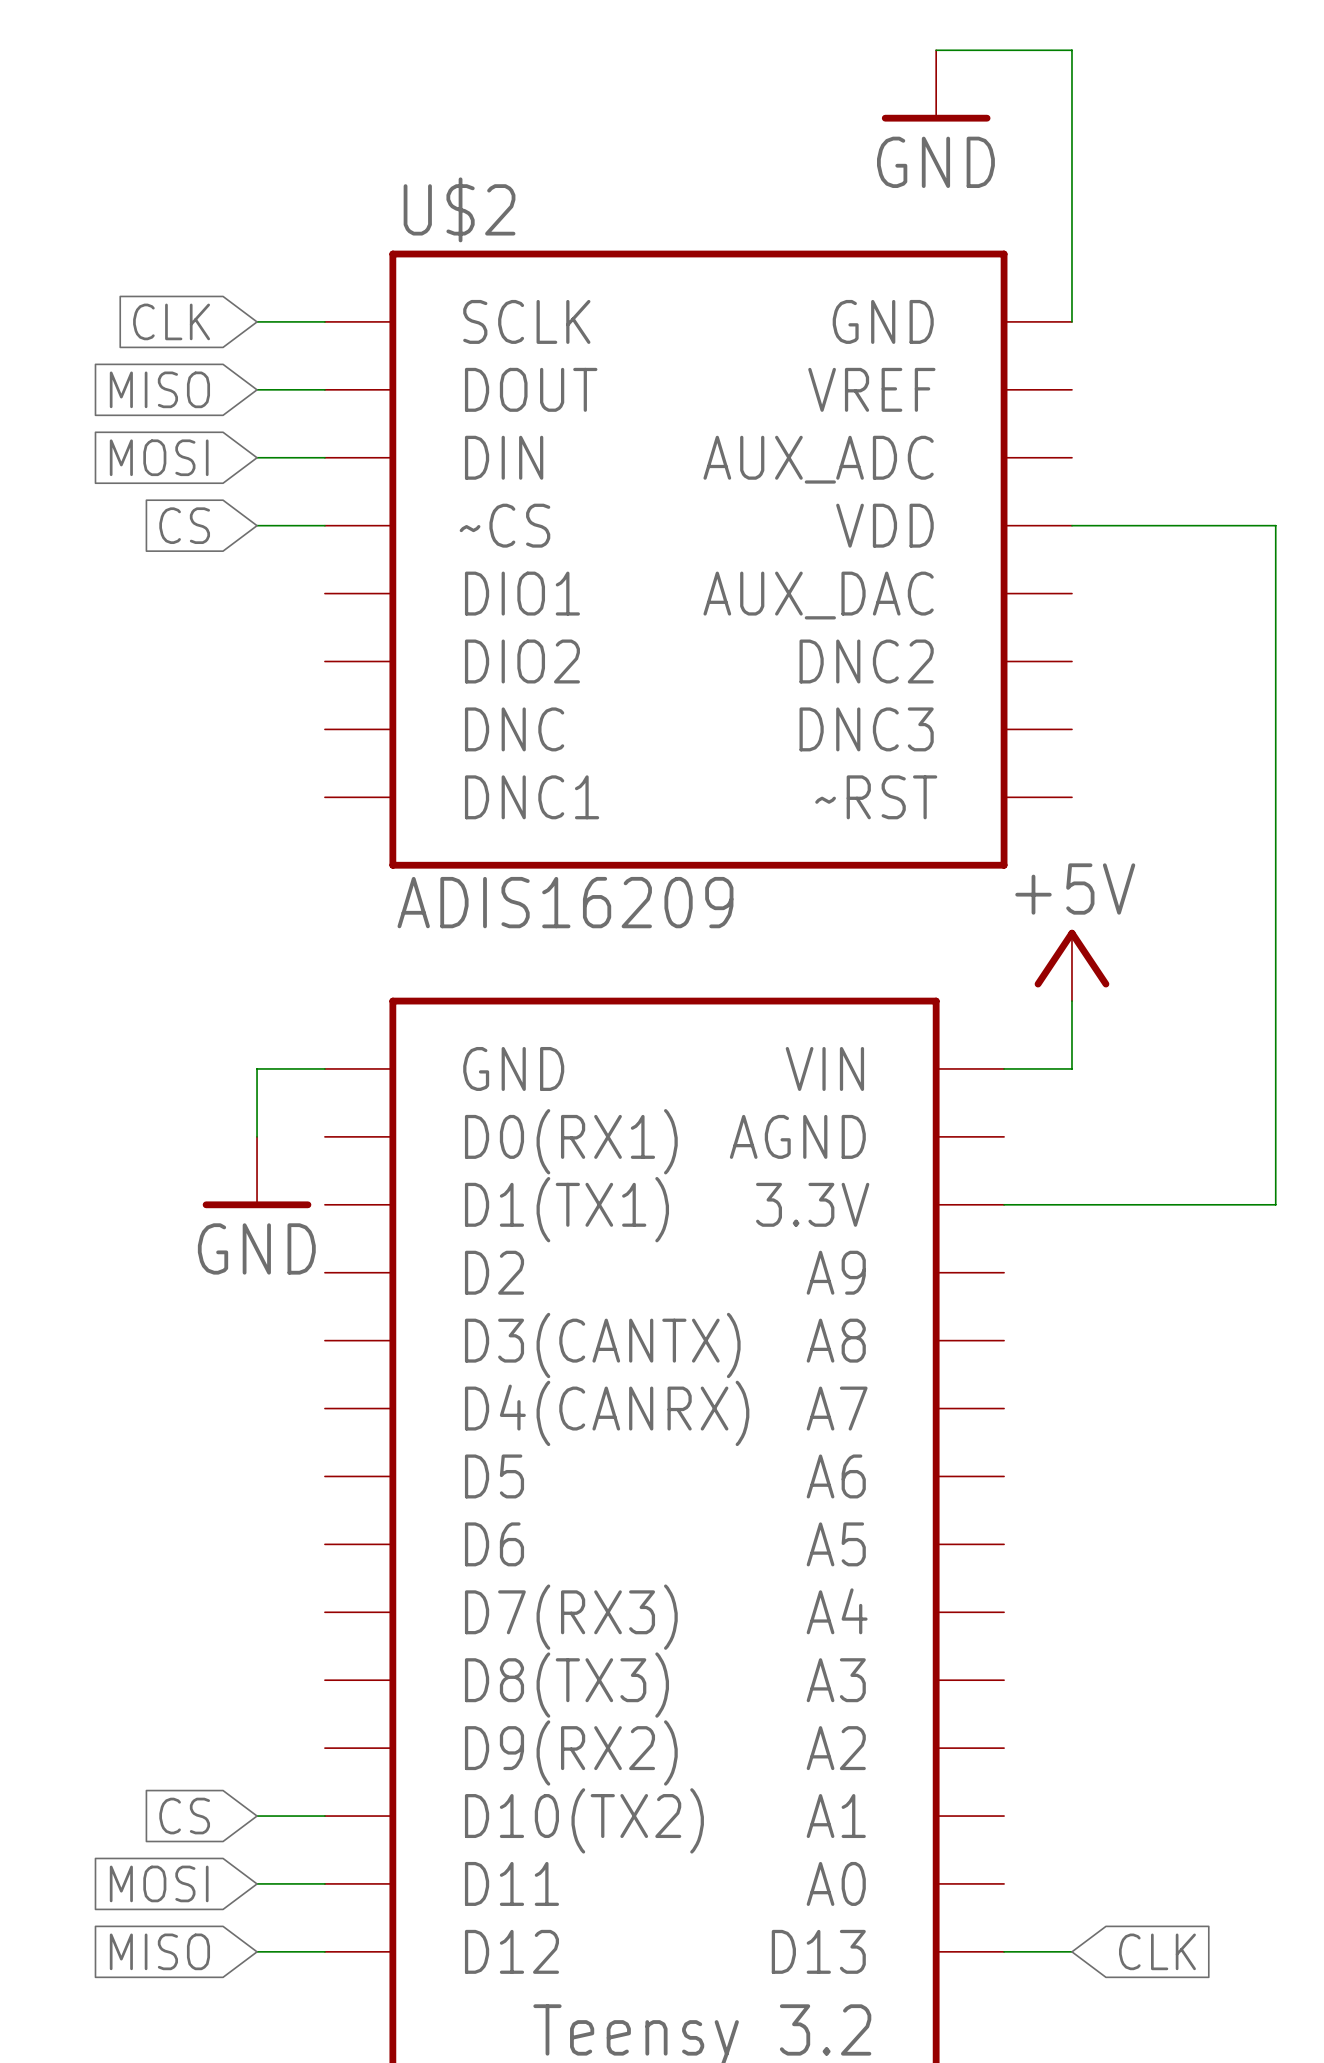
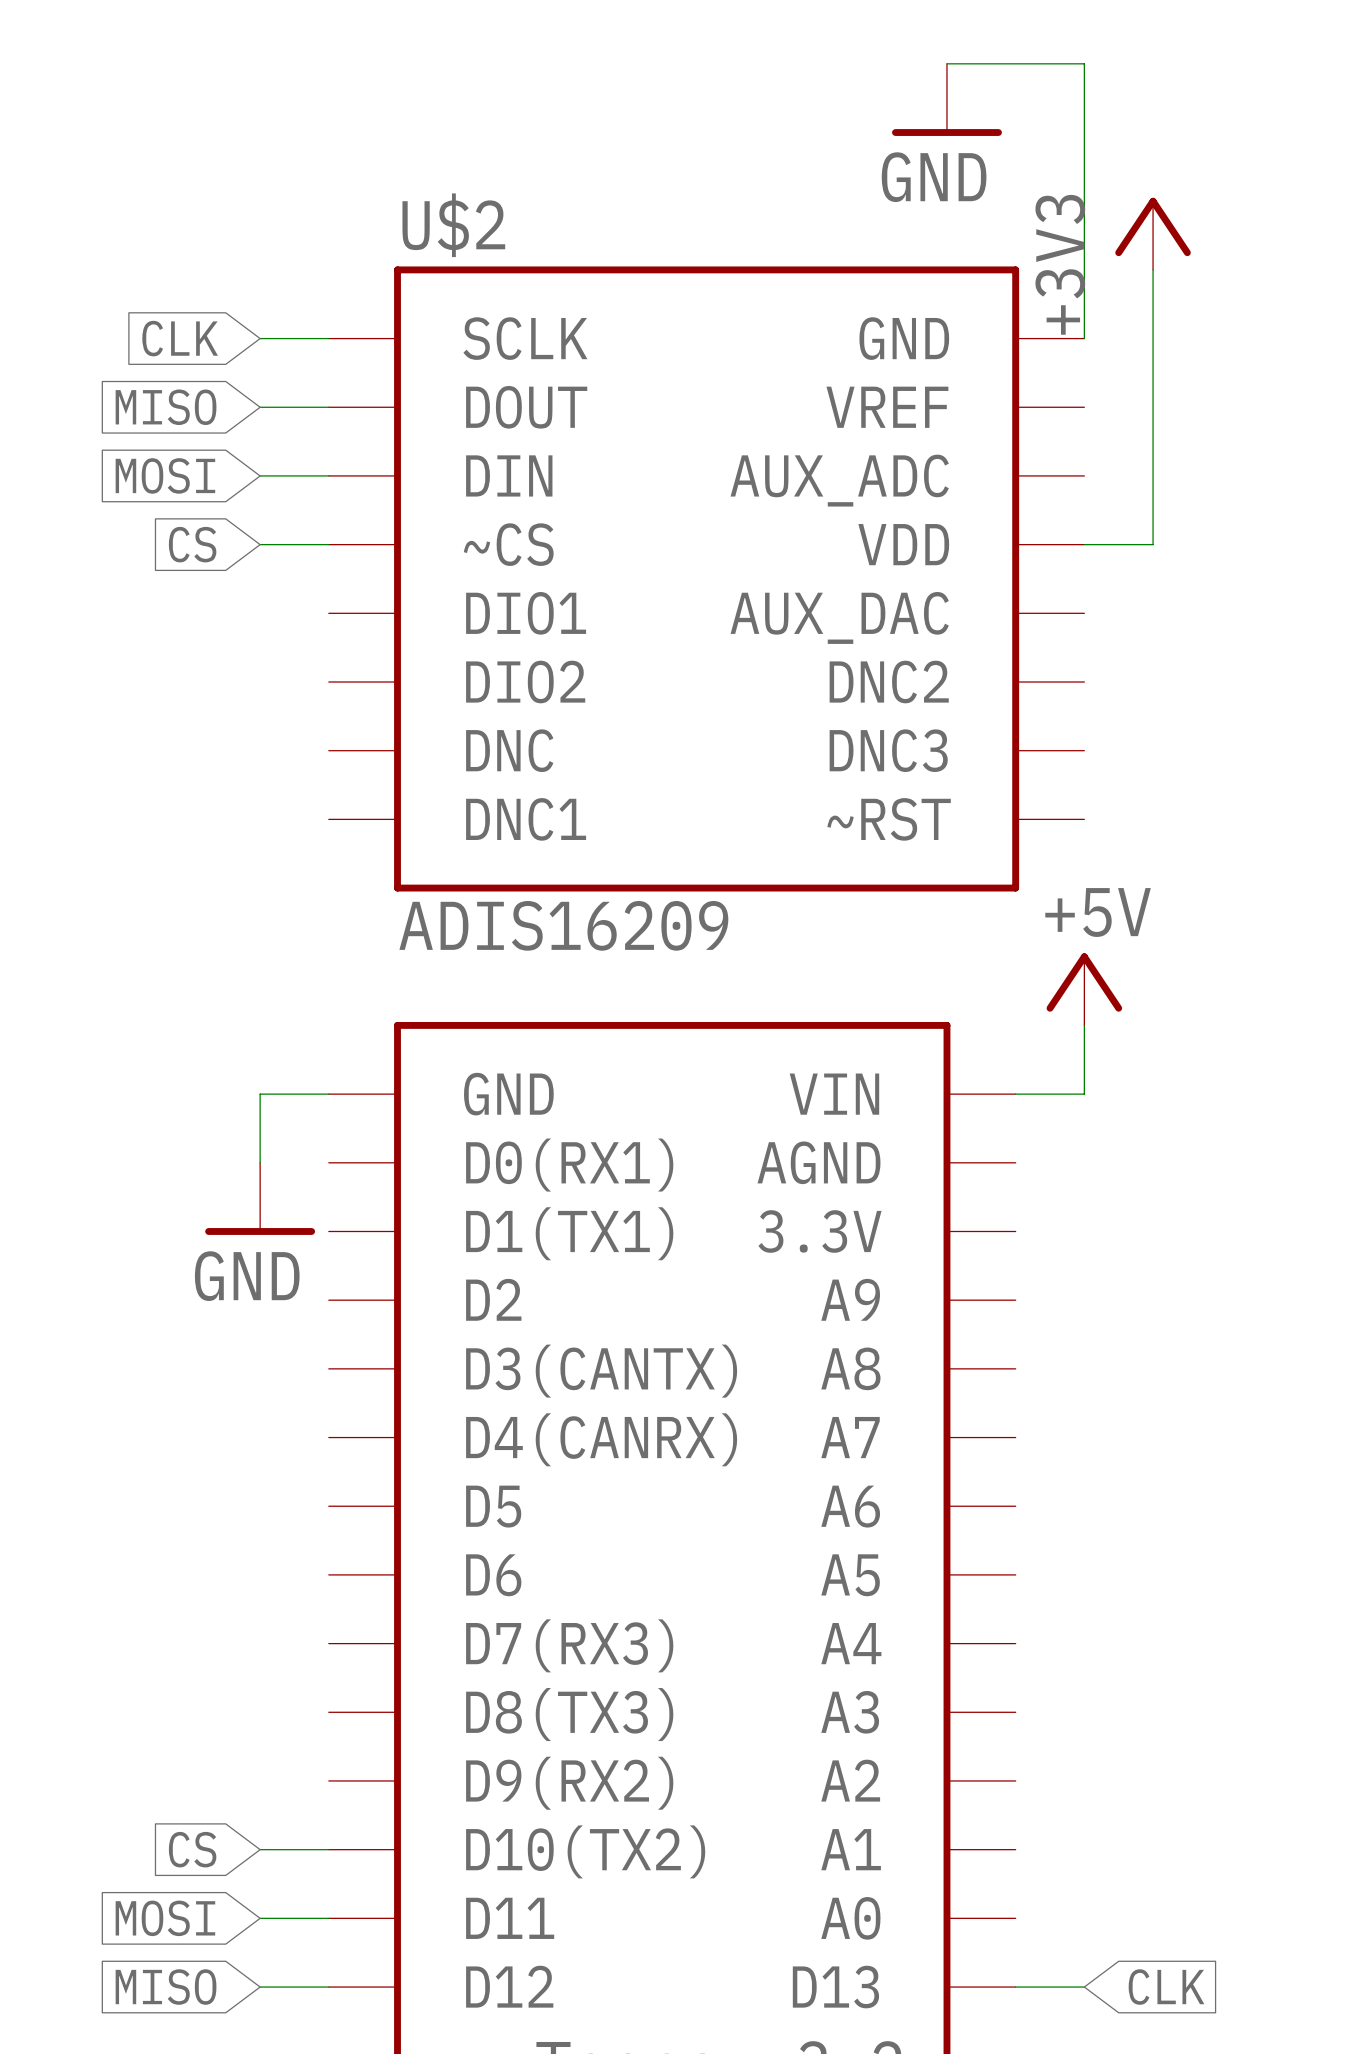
power symbol: none -> +3V3 (1153, 233)
wire: (1139, 525) (1275, 525) (1275, 1204) (1004, 1204) -> (1153, 544) (1153, 269)

